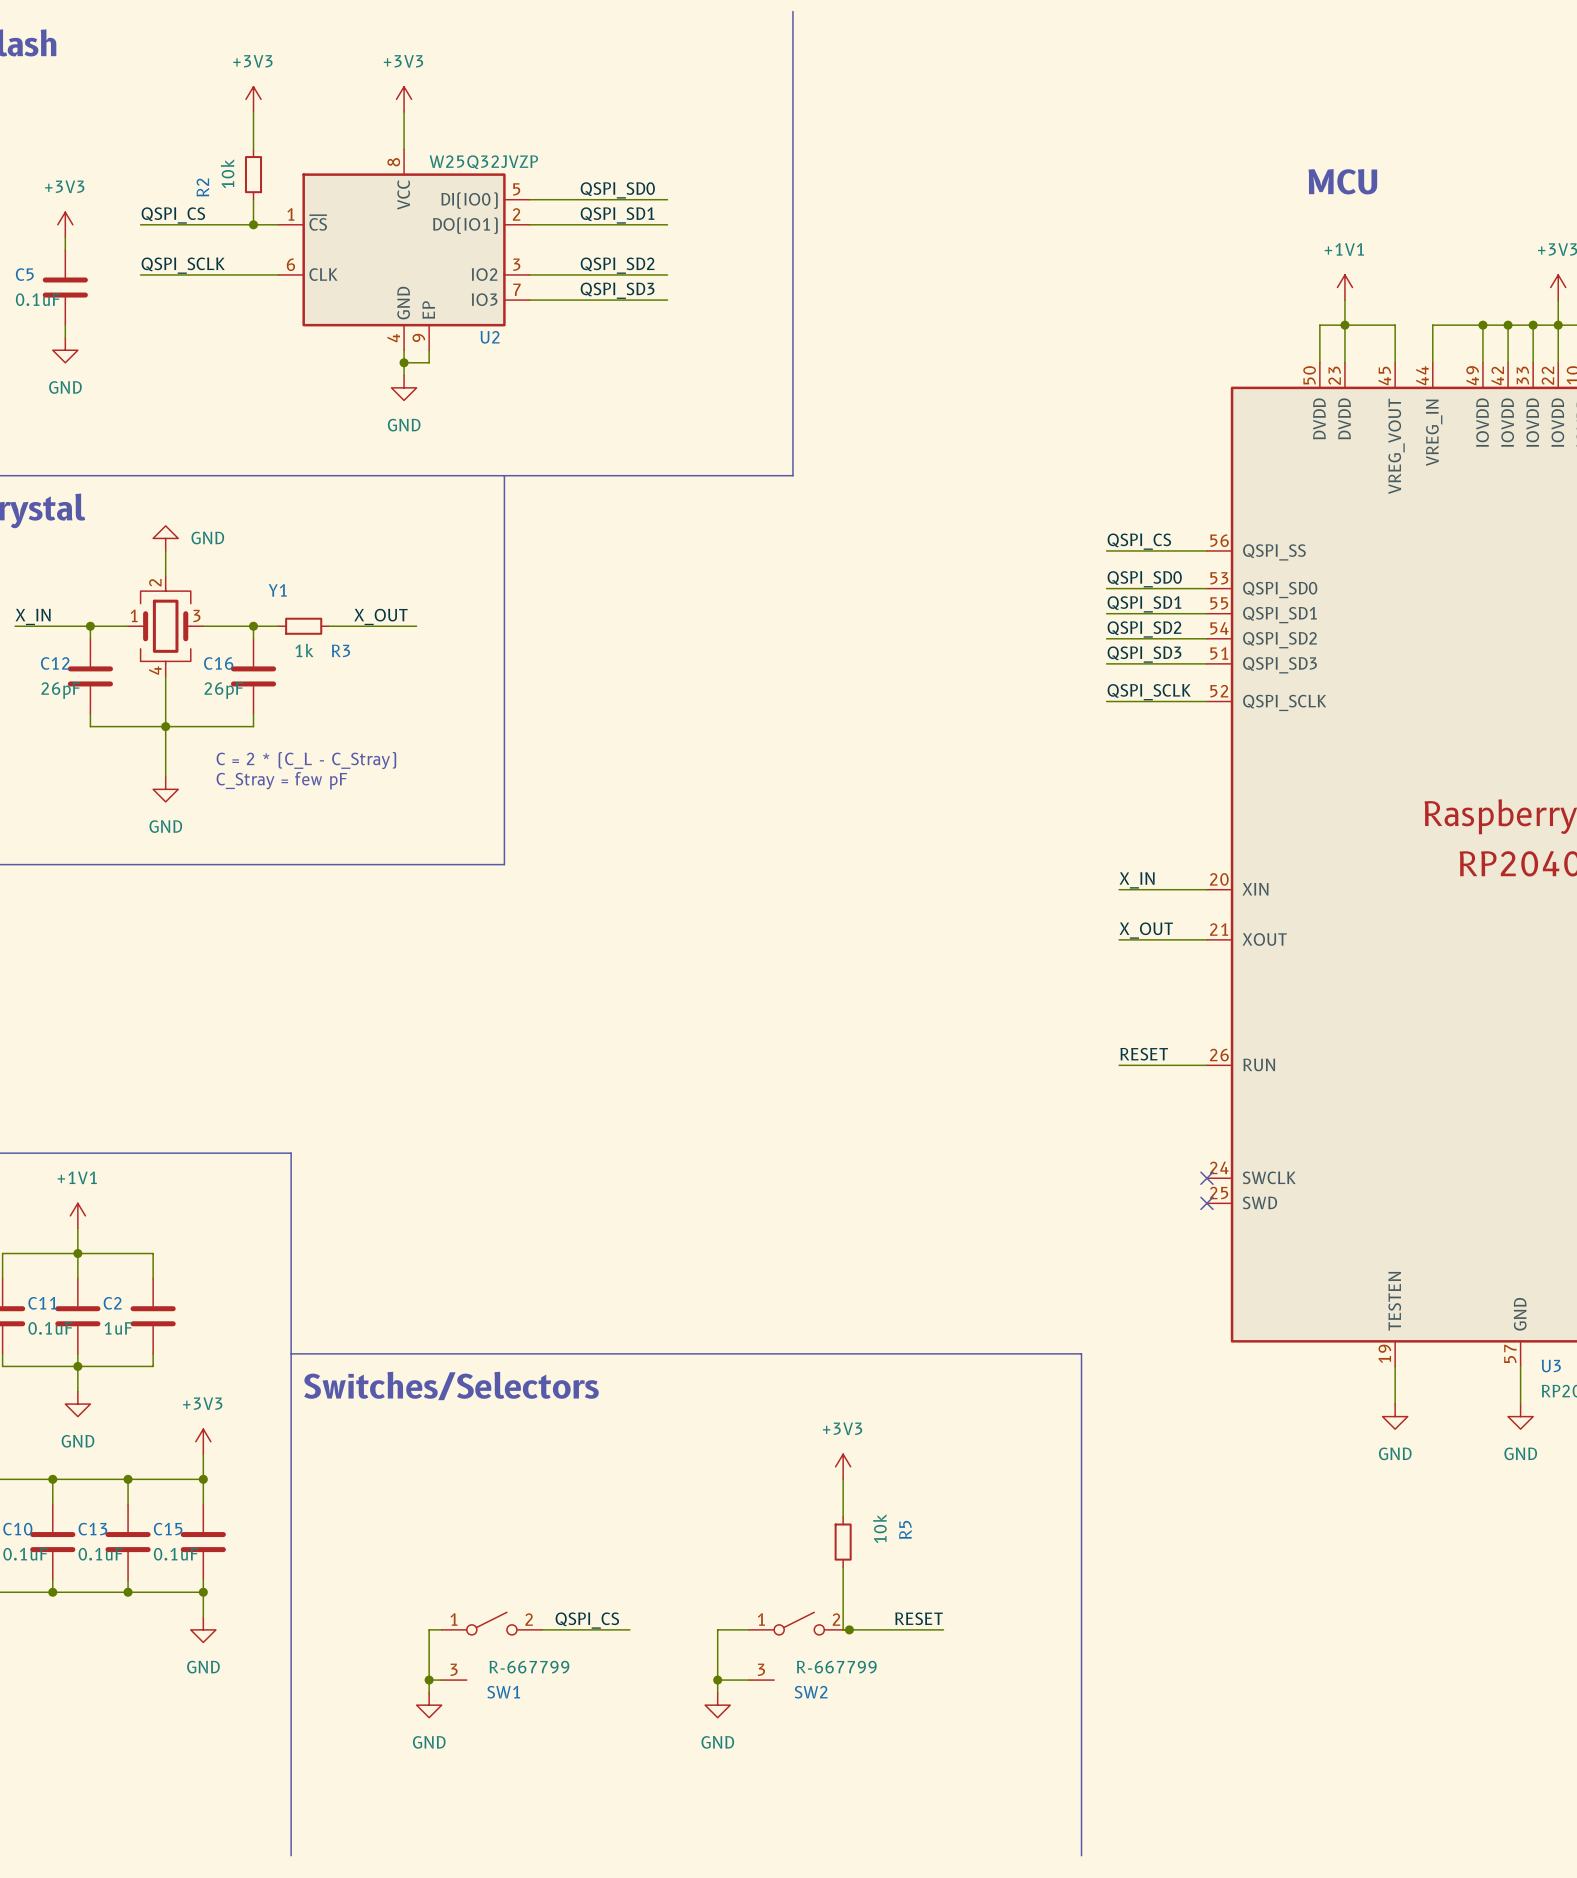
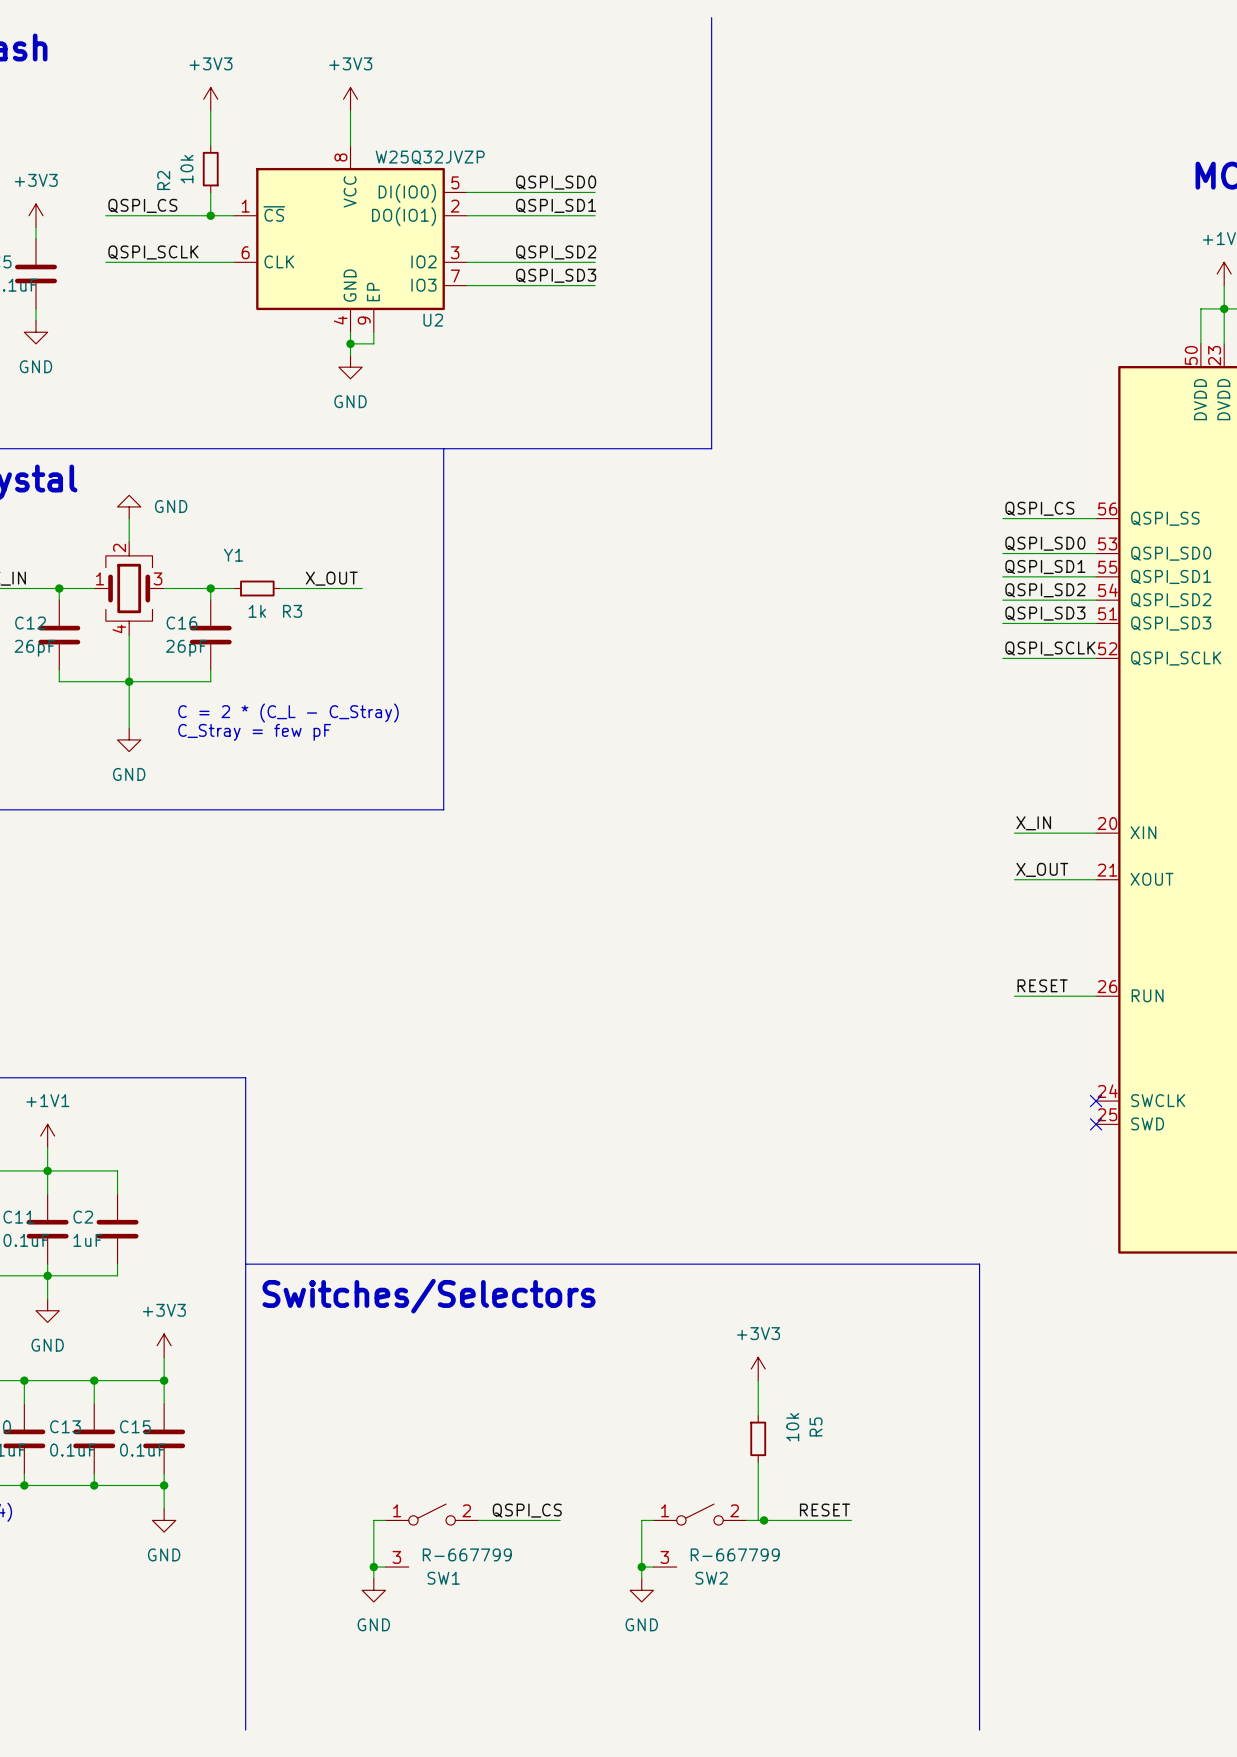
SW2 position: (1042, 1417) -> (925, 1323)

